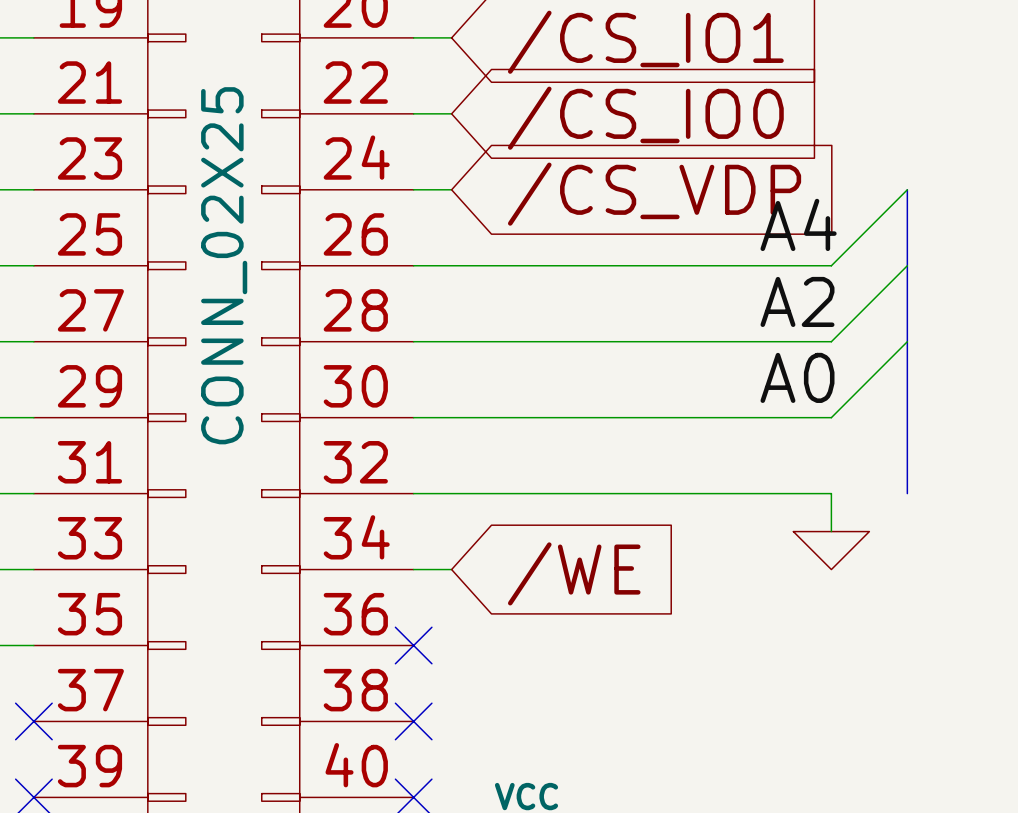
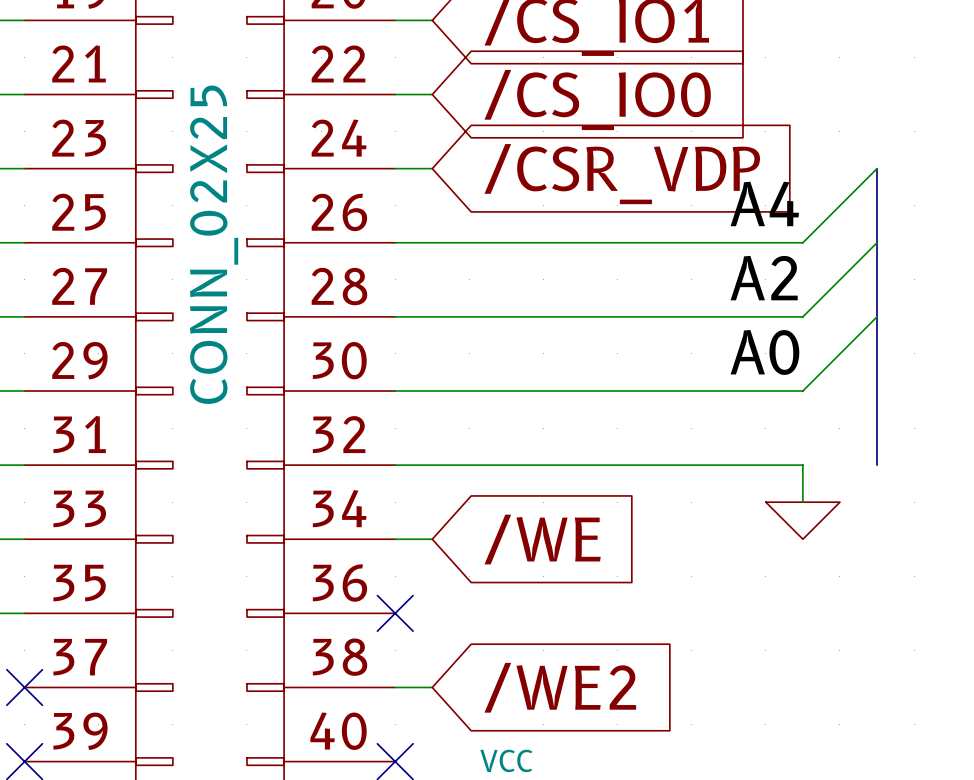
global label: /CS_VDP (654, 194) -> /CSR_VDP (622, 174)
wire: none -> (395, 687) (432, 687)
no-connect mark: (413, 721) -> none
global label: none -> /WE2 (560, 687)

